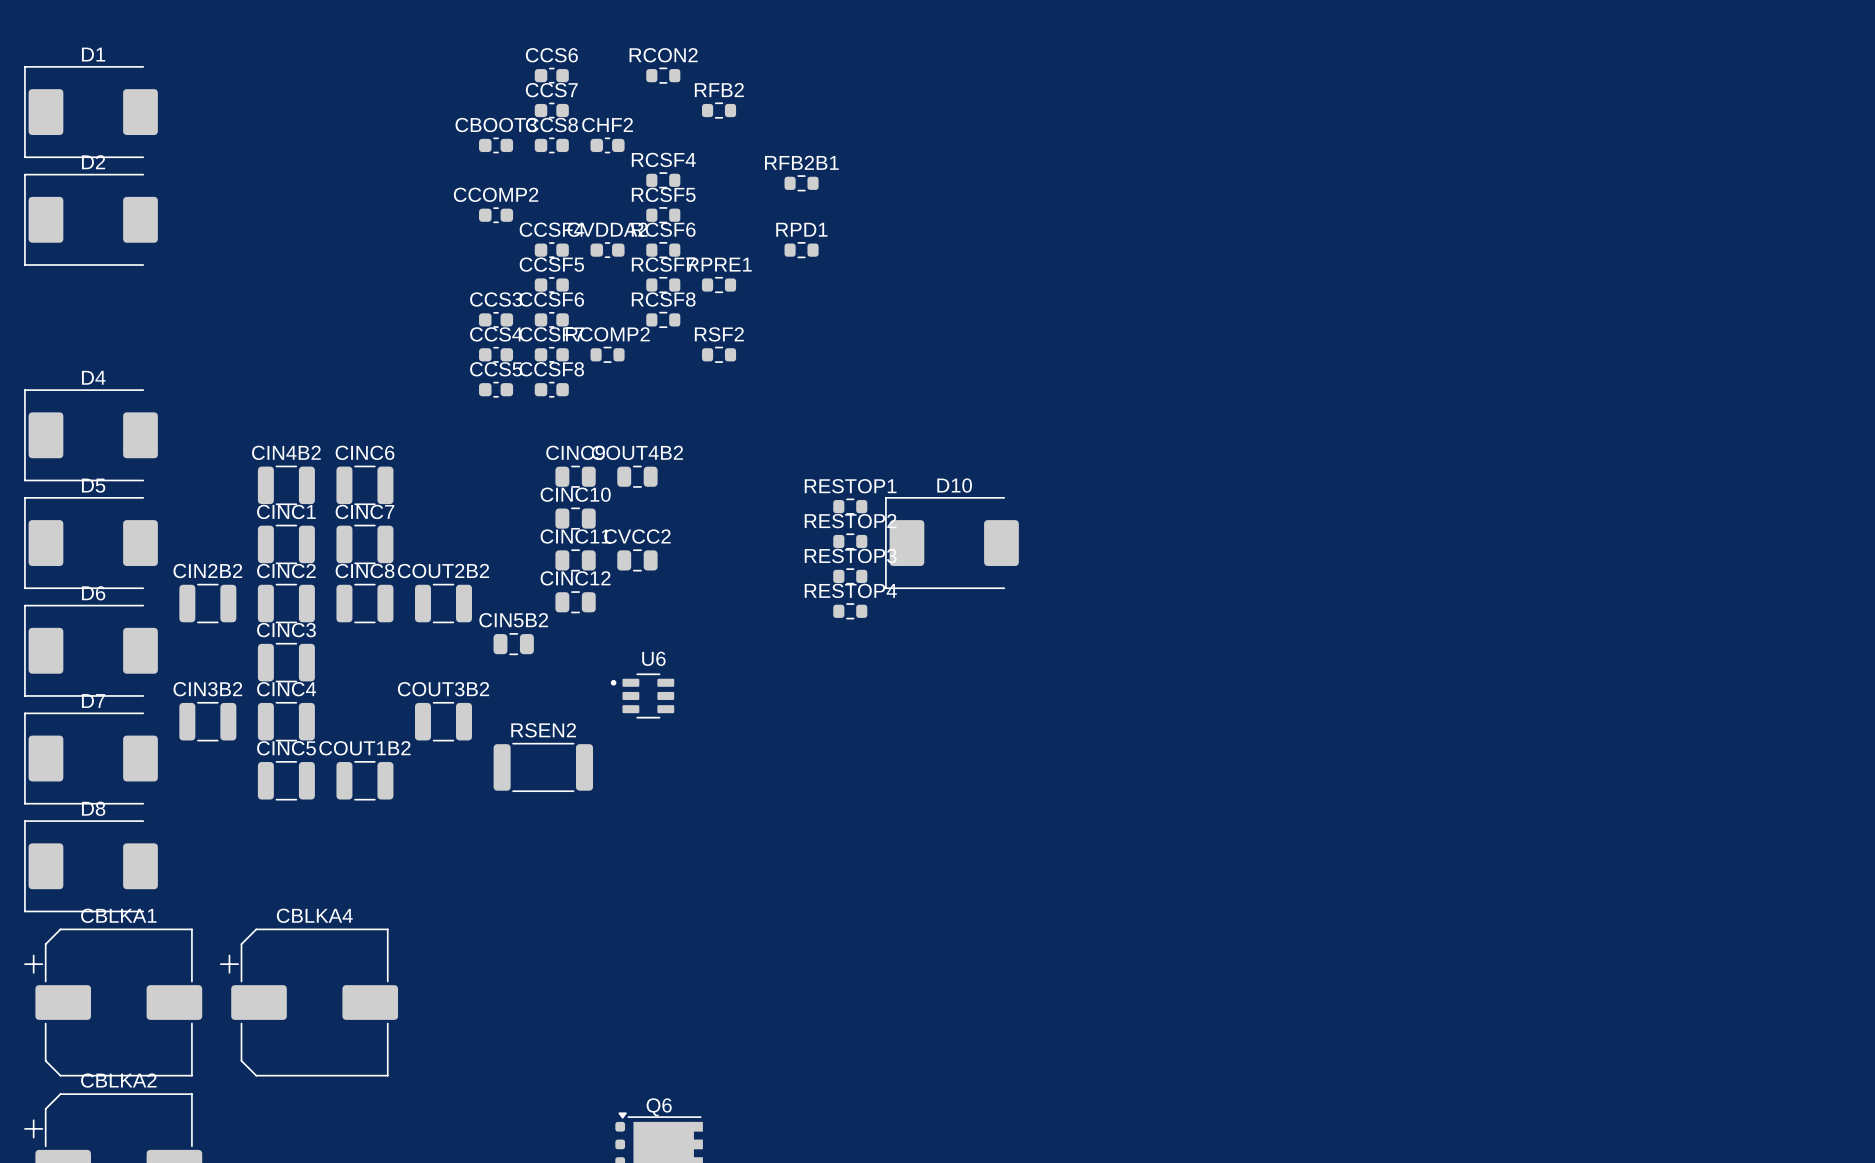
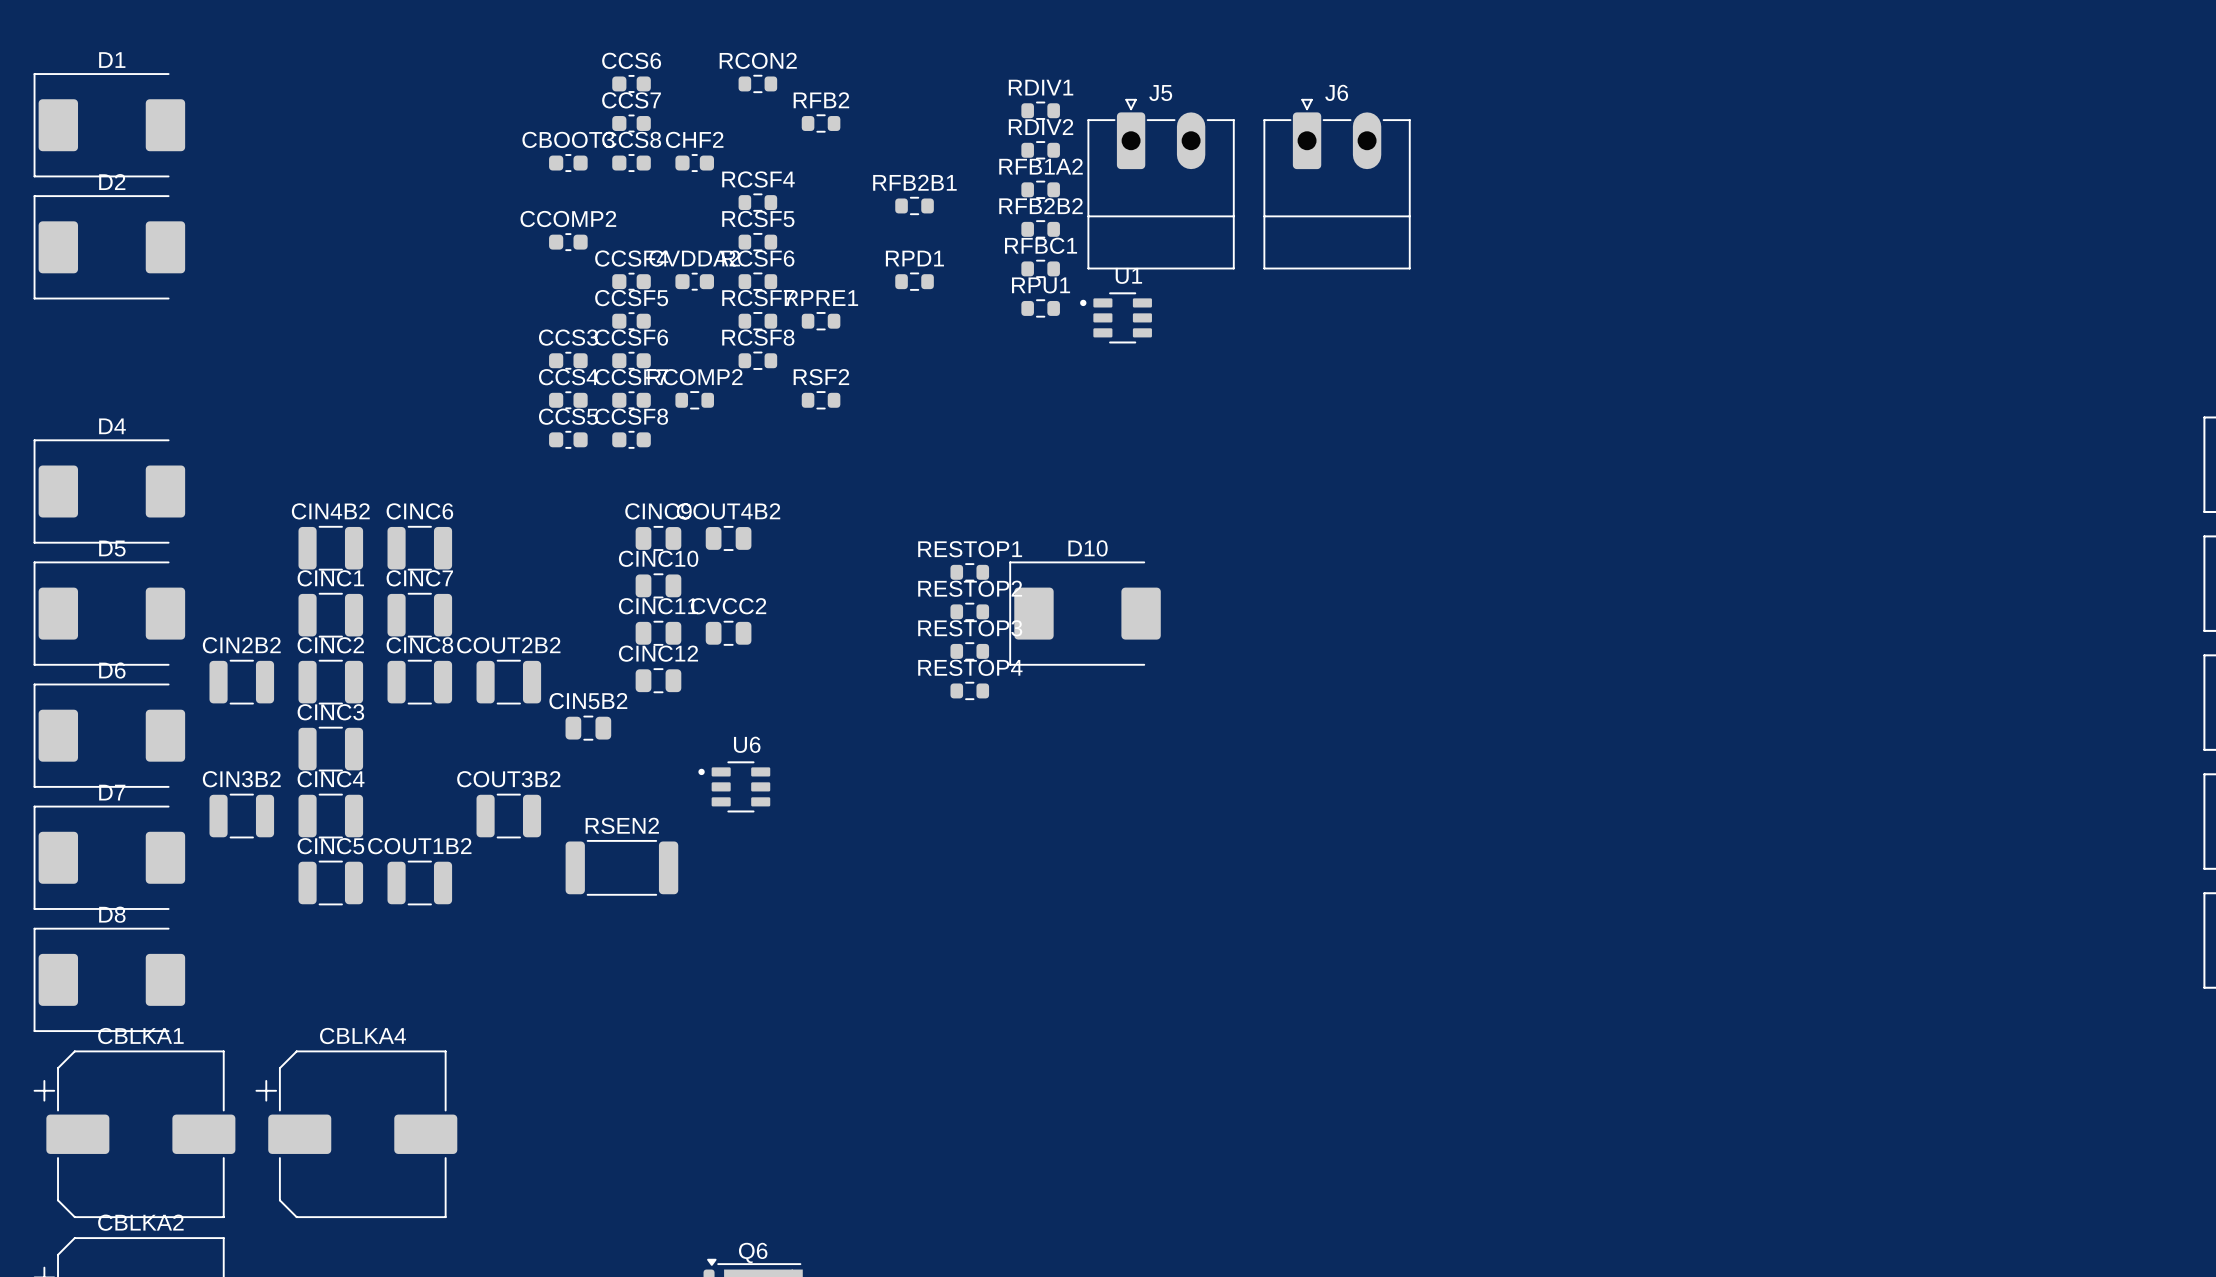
RDIV1: none -> (1040, 110)
RDIV2: none -> (1040, 150)
J5: none -> (1161, 184)
J6: none -> (1337, 184)
RFB1A2: none -> (1040, 189)
RFB2B2: none -> (1040, 229)
RFBC1: none -> (1040, 268)
RPU1: none -> (1040, 308)
U1: none -> (1116, 317)

